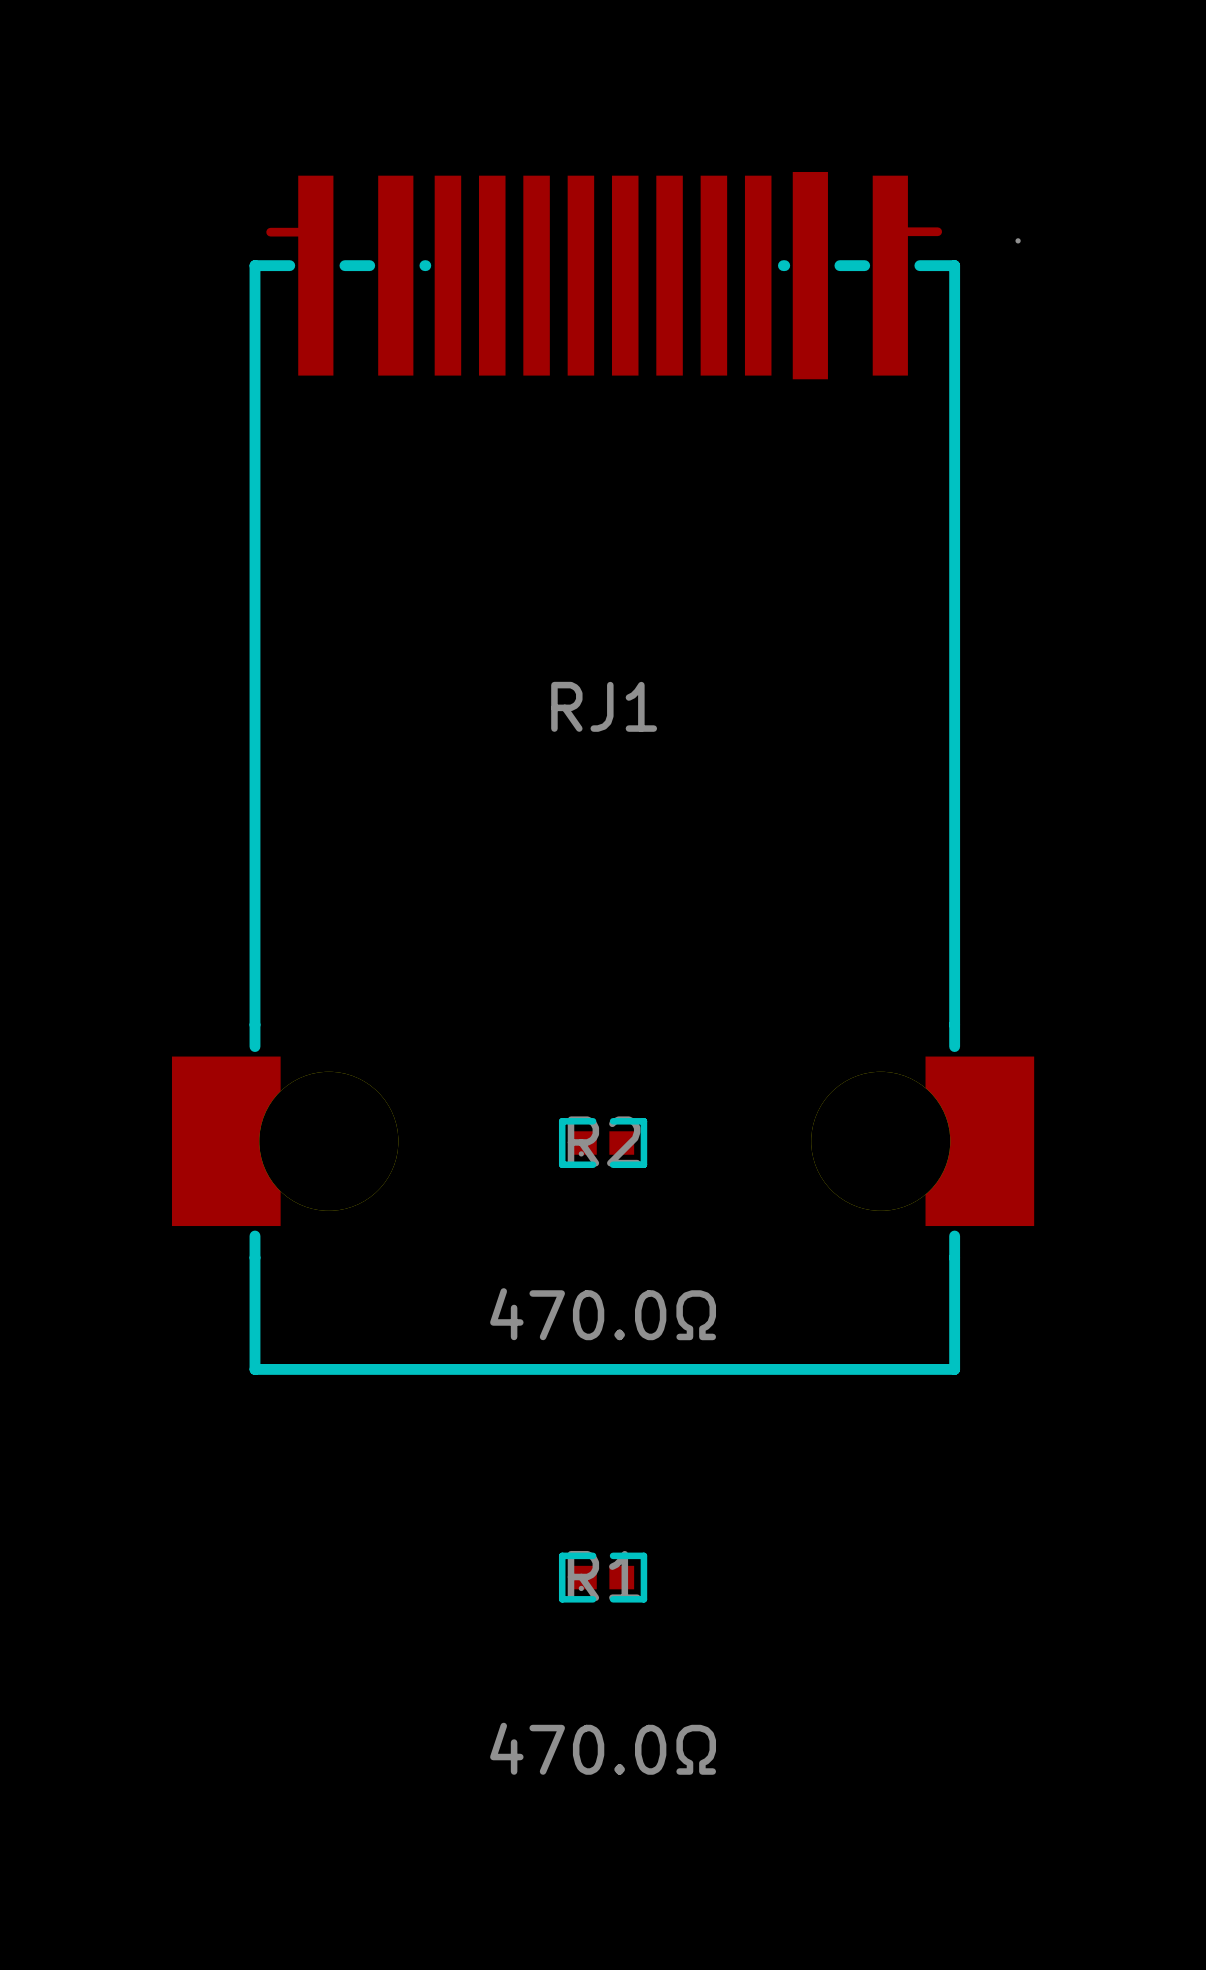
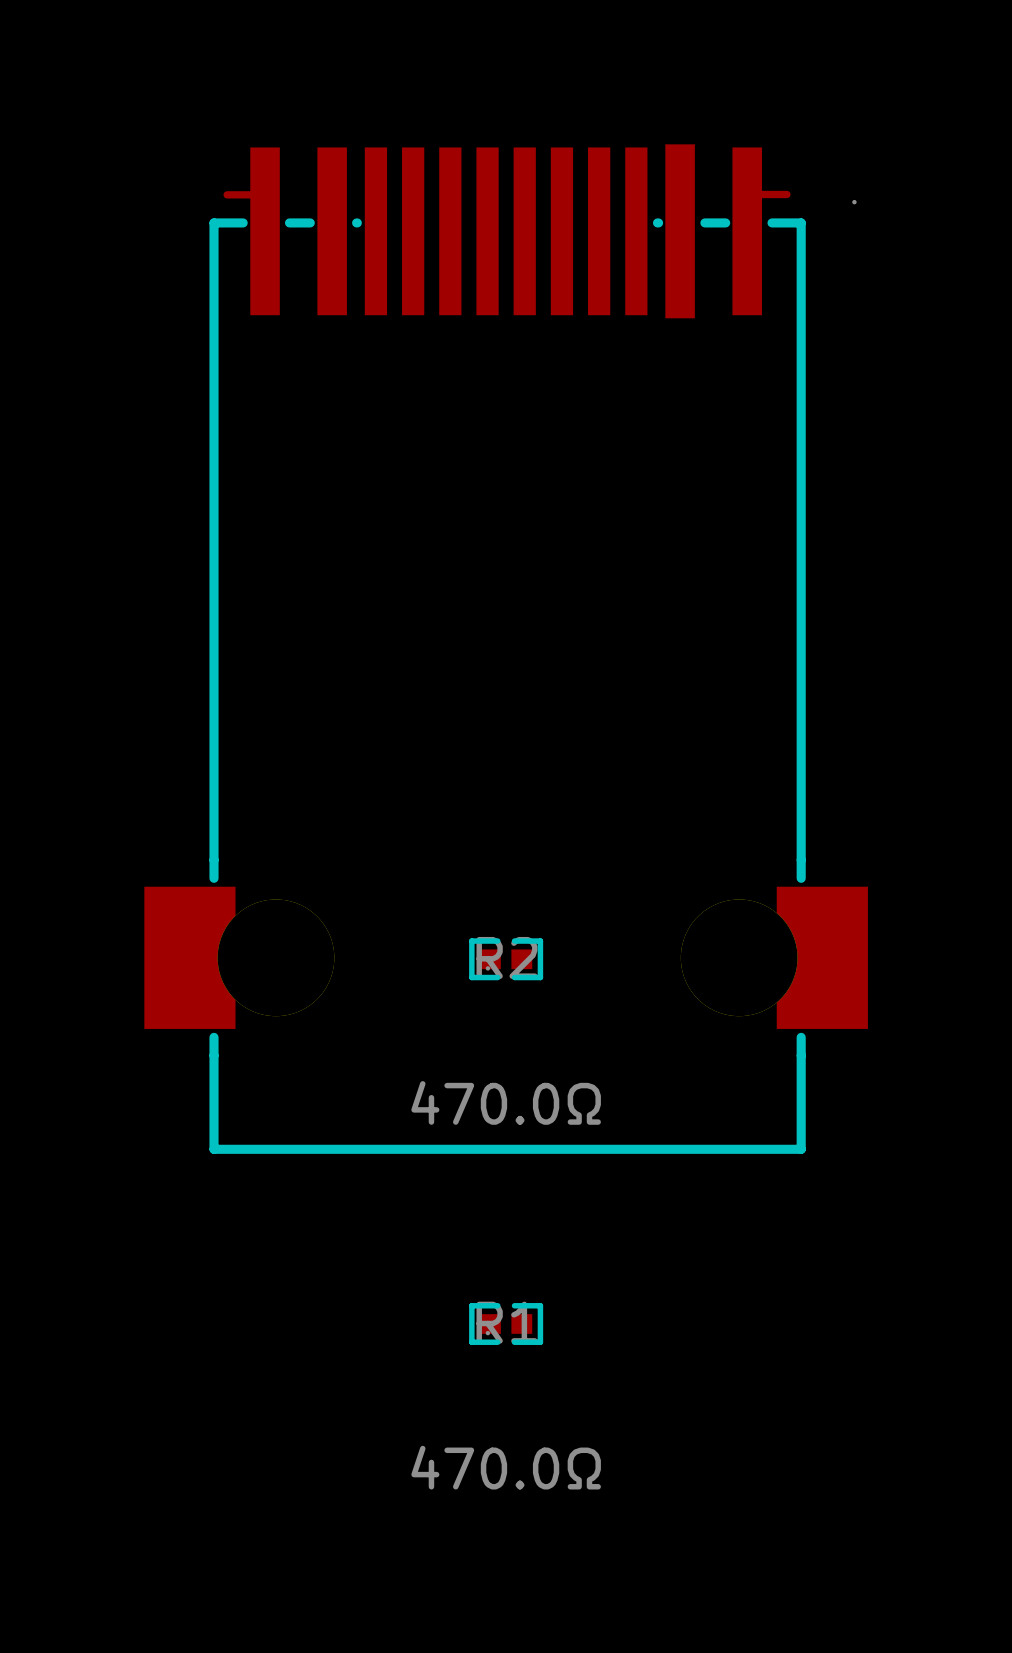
RJ1 name: RJ1 (604, 706) -> none

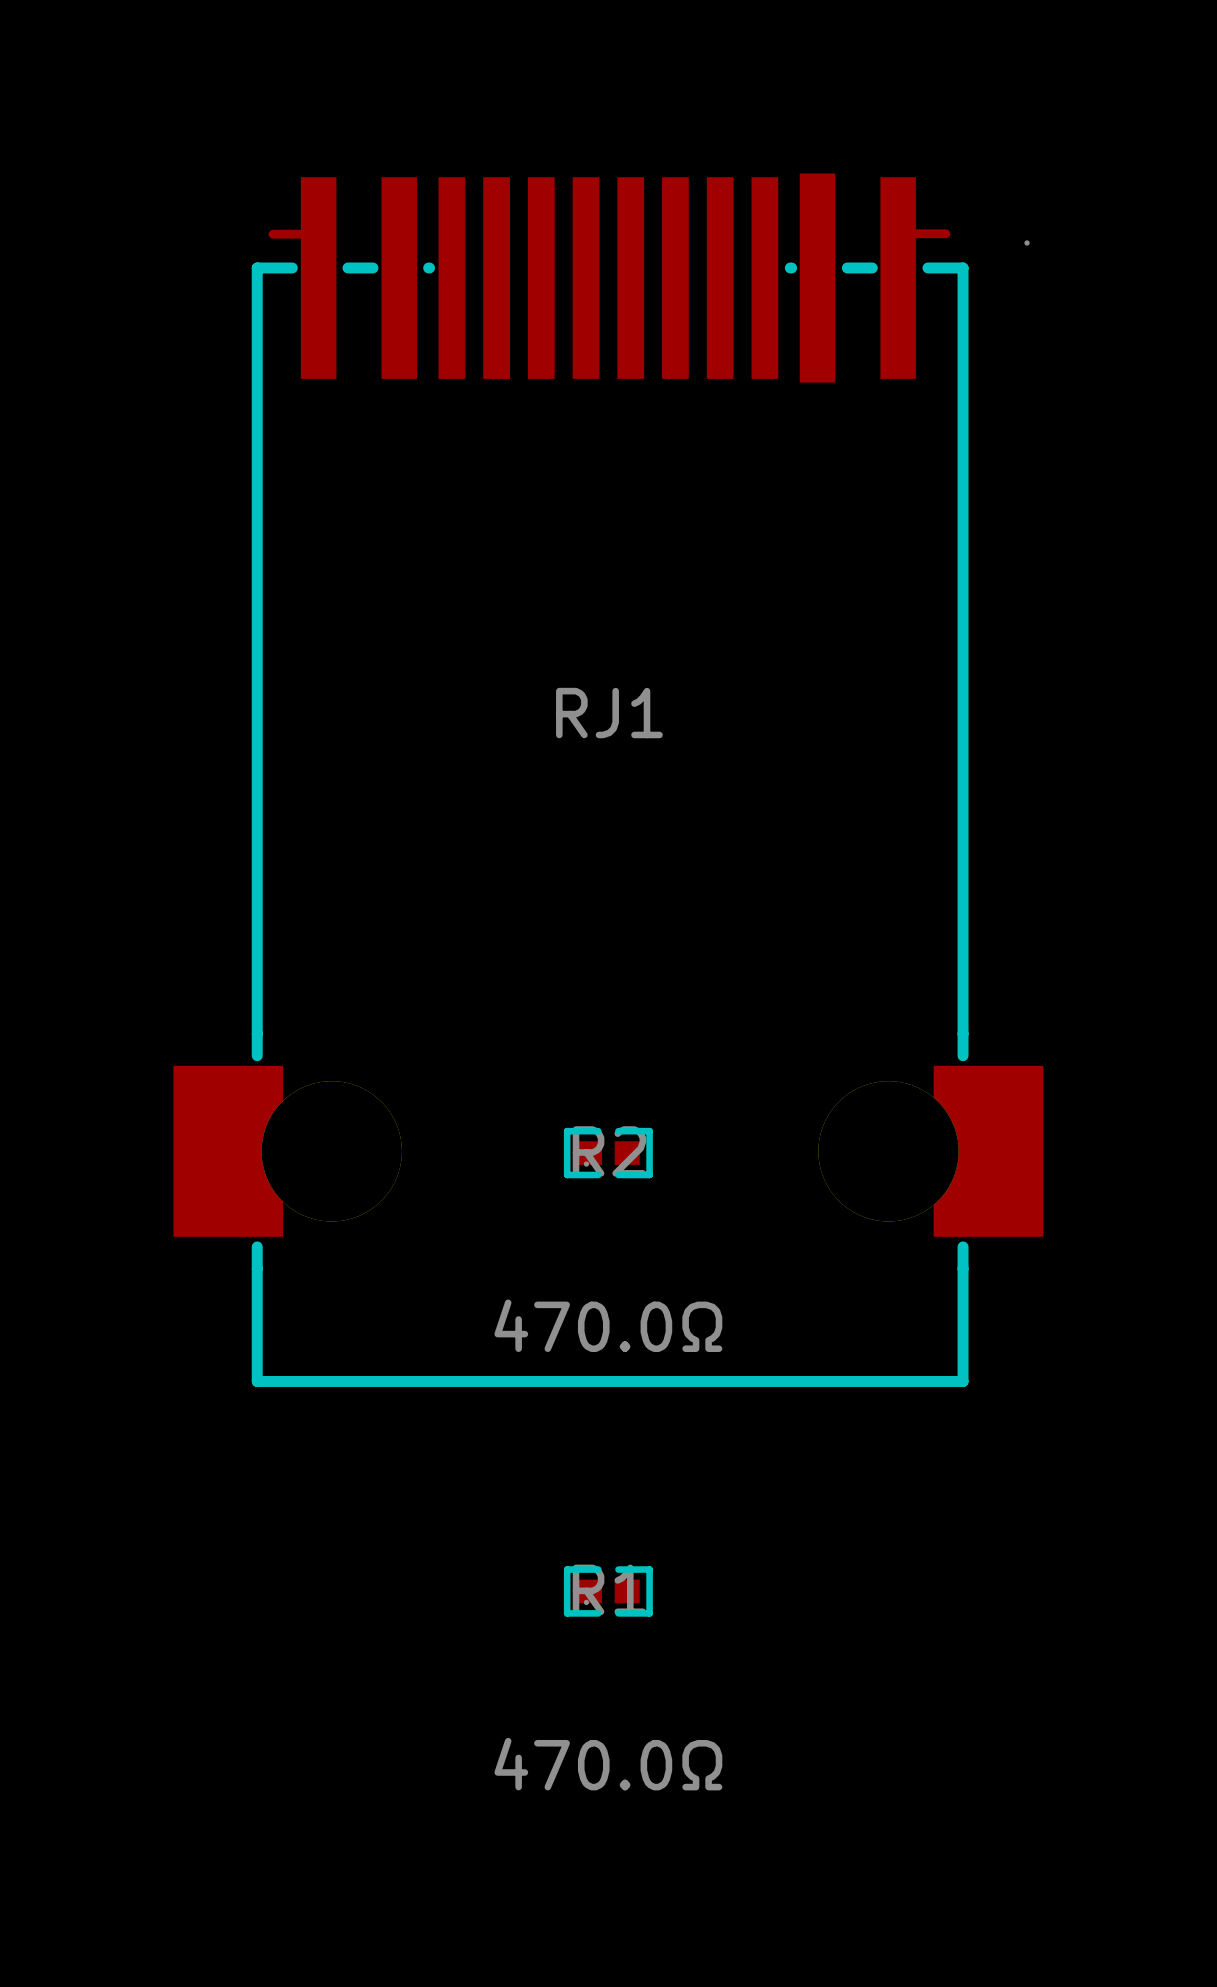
RJ1 name: none -> RJ1 (609, 713)

